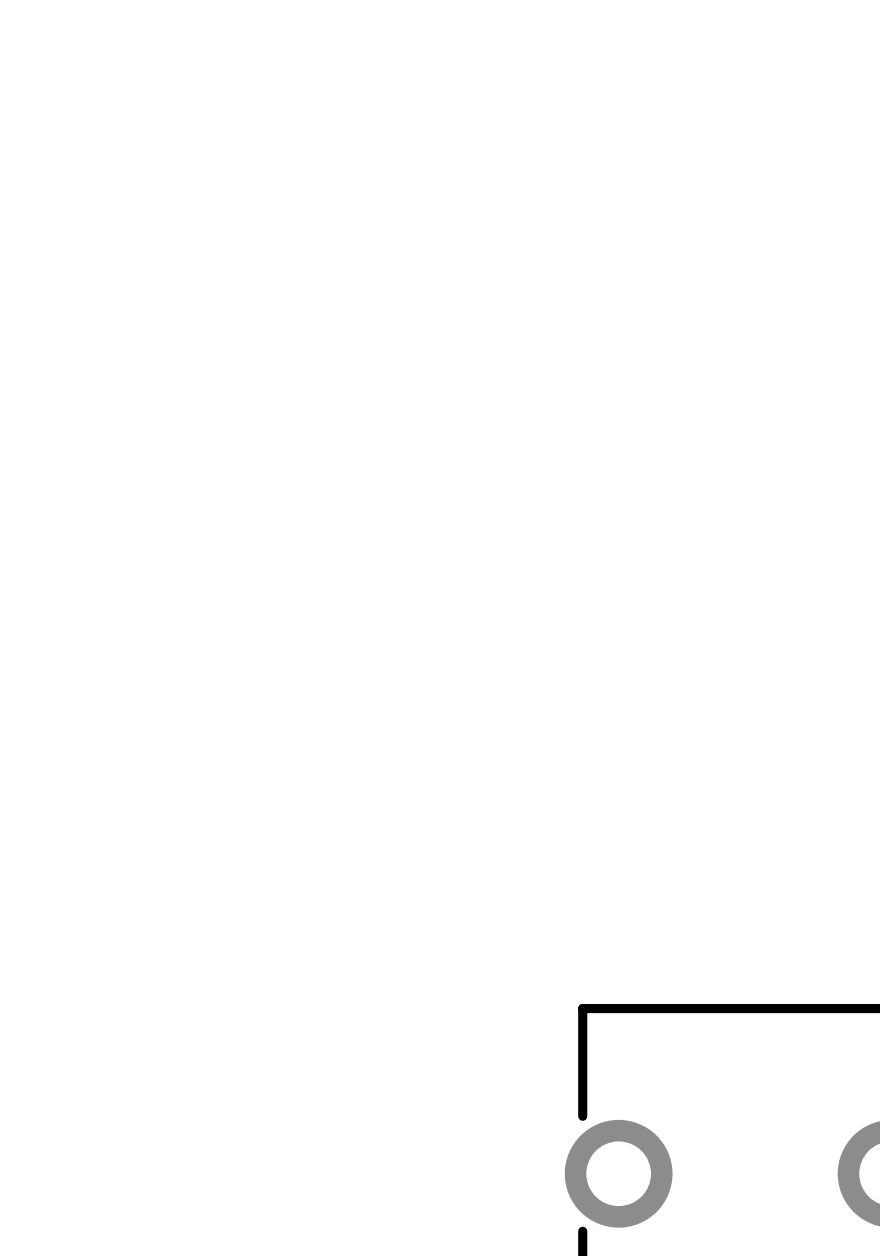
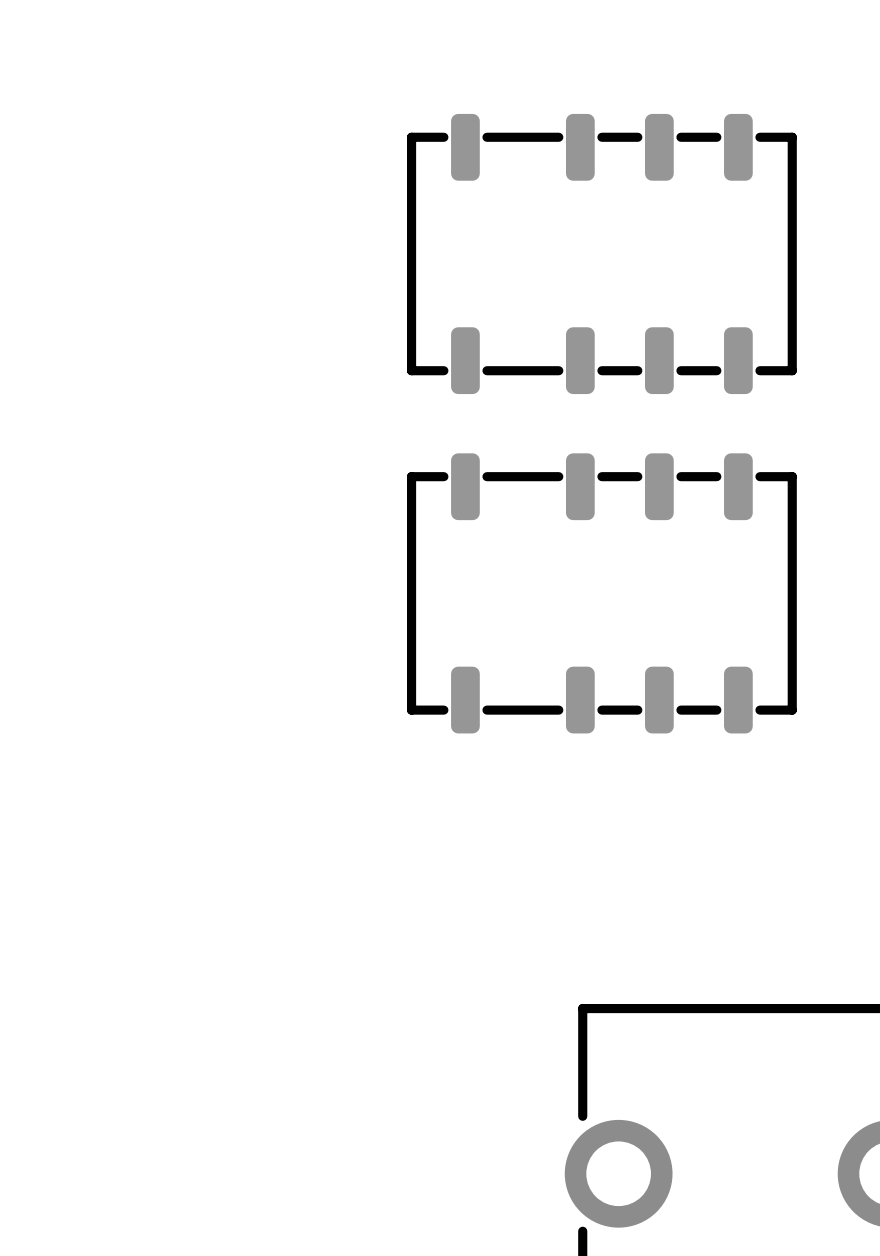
part: none -> (601, 253)
part: none -> (601, 593)

